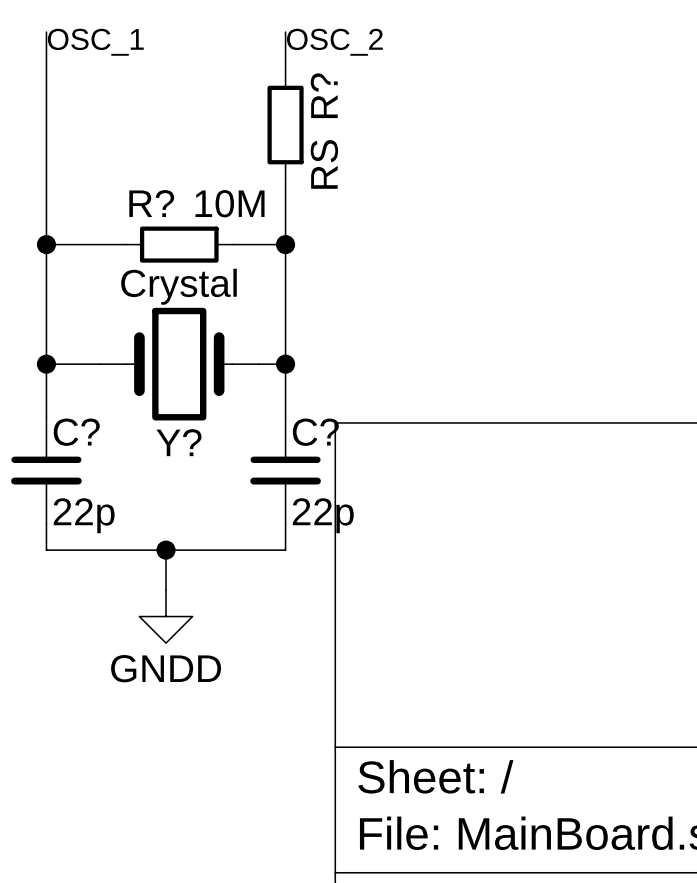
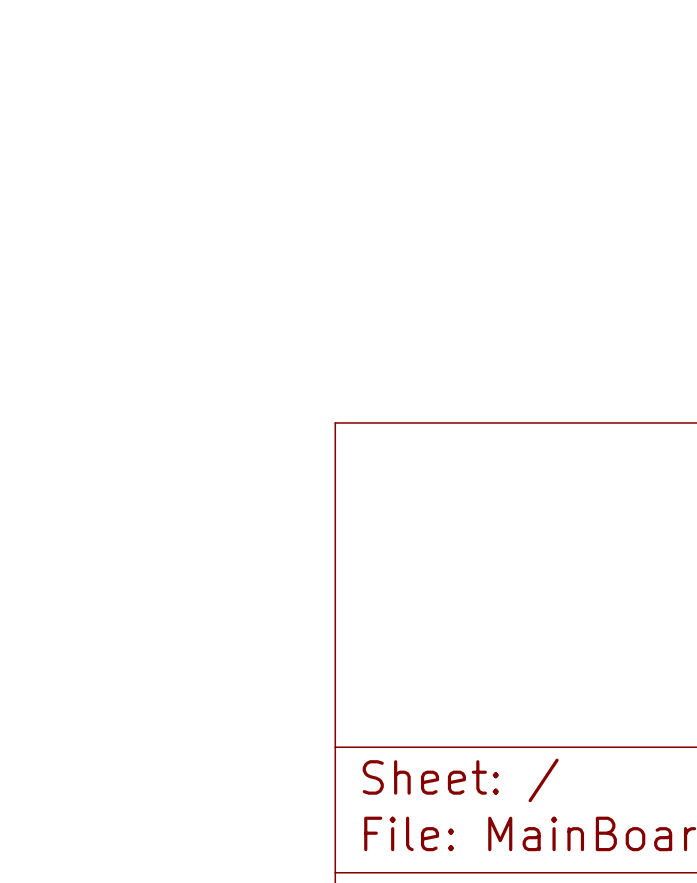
wire: (46, 32) (46, 417) -> none
wire: (285, 32) (285, 71) -> none
label: OSC_1 (95, 42) -> none
label: OSC_2 (334, 42) -> none
R?: RS (285, 125) -> none
wire: (285, 178) (285, 417) -> none
wire: (46, 244) (126, 244) -> none
junction: (46, 244) -> none
R?: 10M (179, 244) -> none
wire: (232, 244) (285, 244) -> none
junction: (285, 244) -> none
wire: (46, 364) (99, 364) -> none
junction: (46, 364) -> none
Y?: Crystal (179, 364) -> none
wire: (258, 364) (285, 364) -> none
junction: (285, 364) -> none
C?: 22p (46, 470) -> none
C?: 22p (285, 470) -> none
wire: (46, 523) (46, 550) (285, 550) (285, 523) -> none
wire: (166, 550) (166, 589) -> none
junction: (166, 550) -> none
power symbol: GNDD (166, 616) -> none

